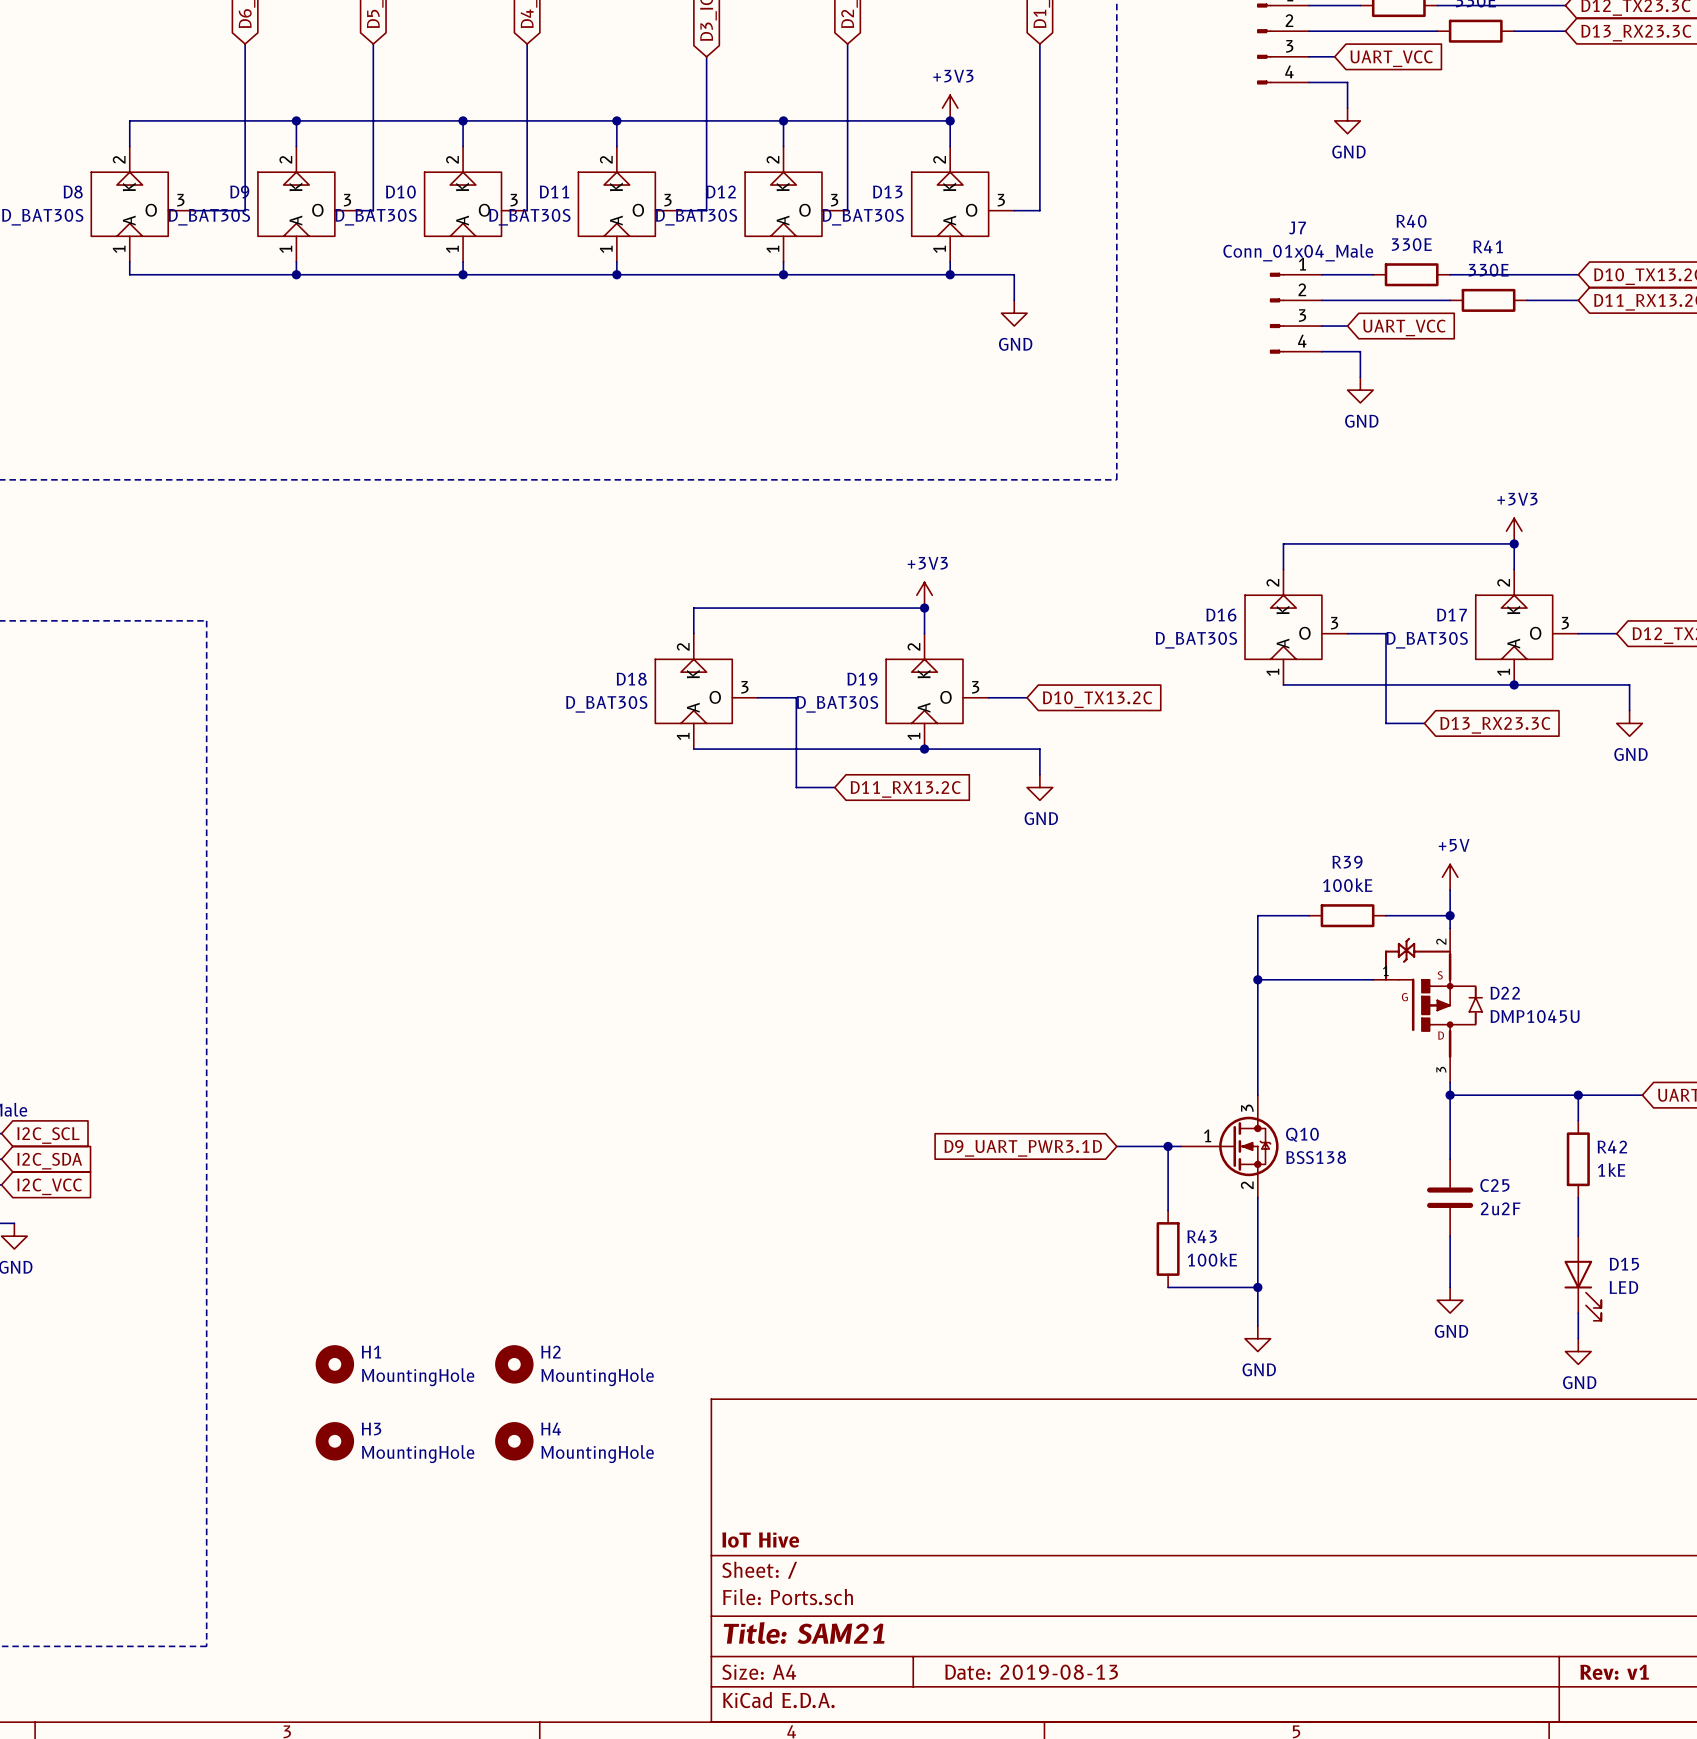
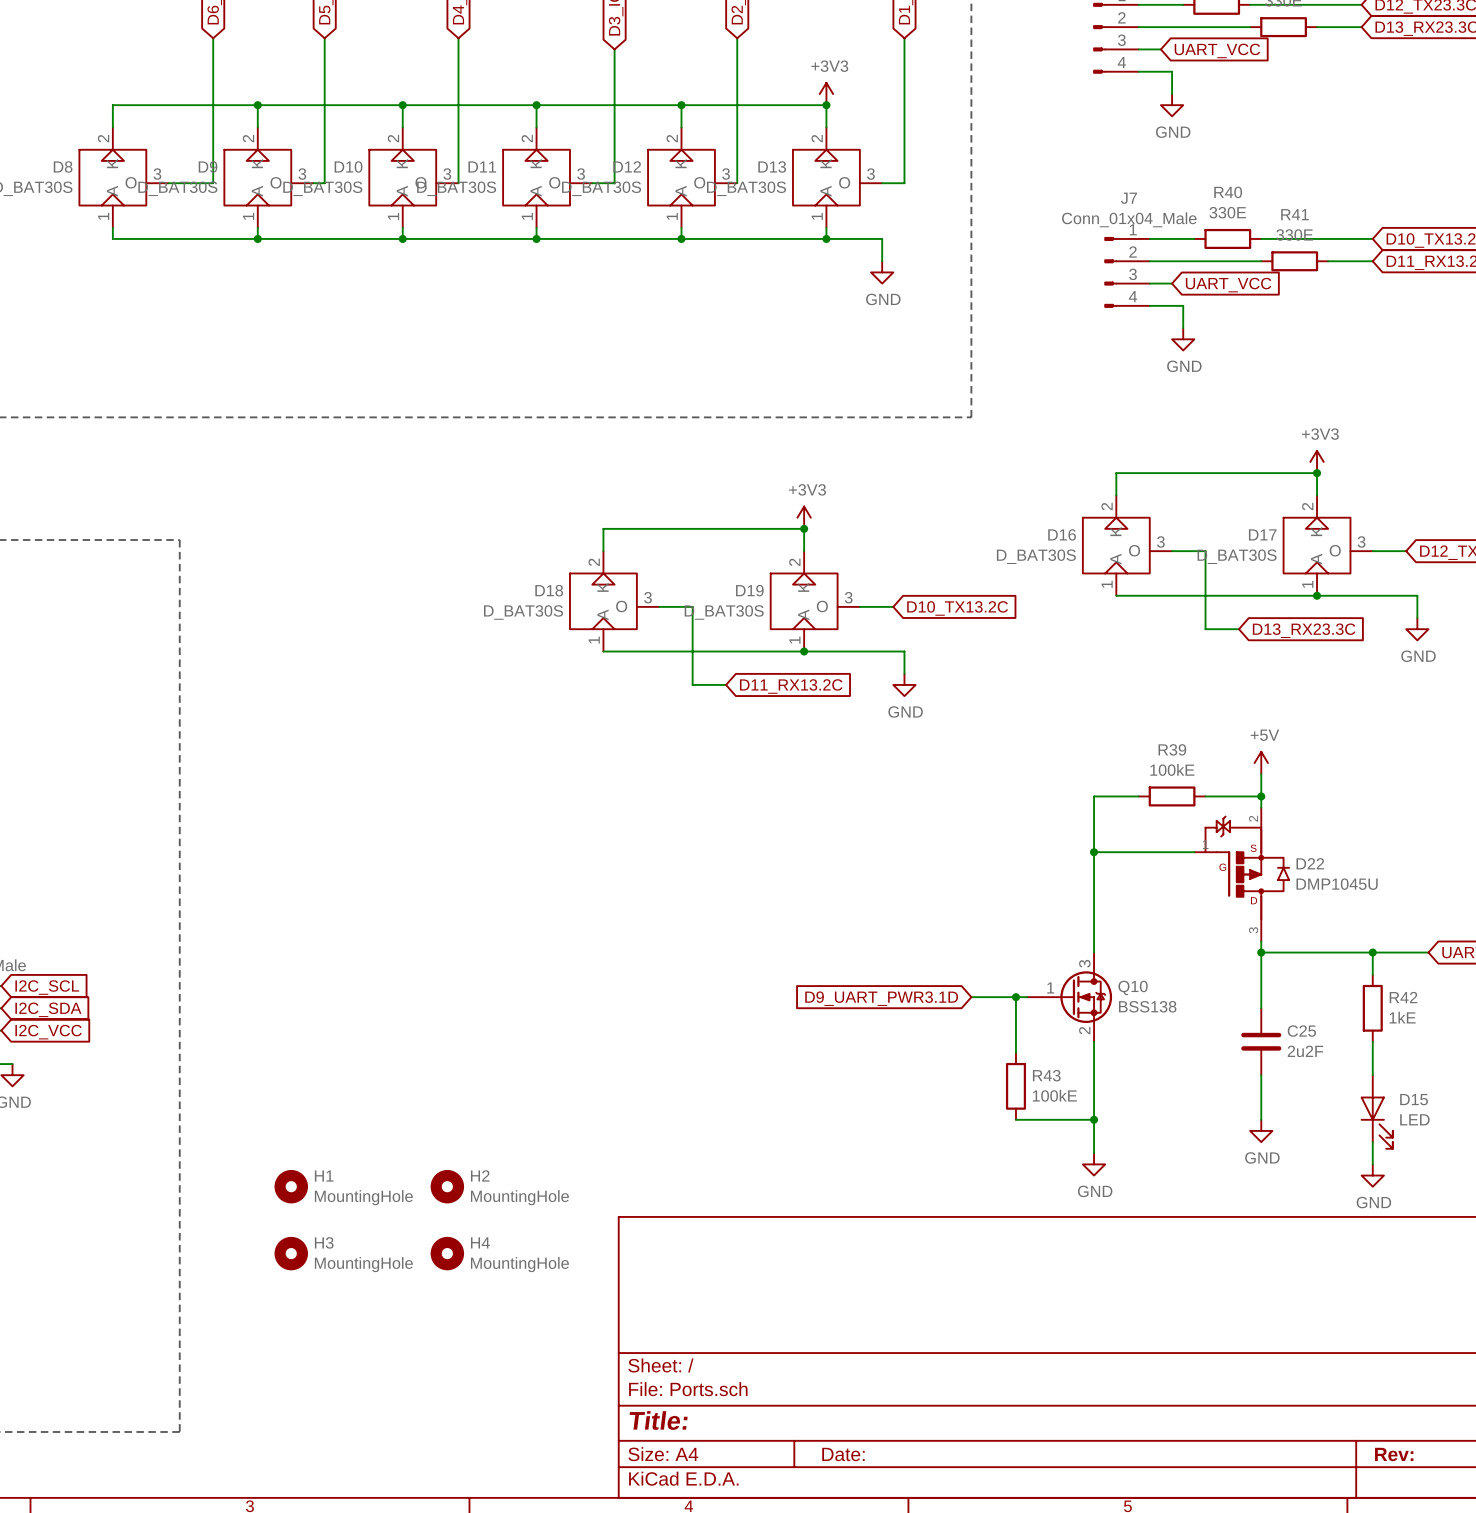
title block: IoT Hive (760, 1540) -> none
title block: Title: SAM21 (804, 1633) -> Title: (658, 1420)
title block: Date: 2019-08-13 (1031, 1672) -> Date: (843, 1454)
title block: Rev: v1 (1614, 1672) -> Rev: (1394, 1454)

